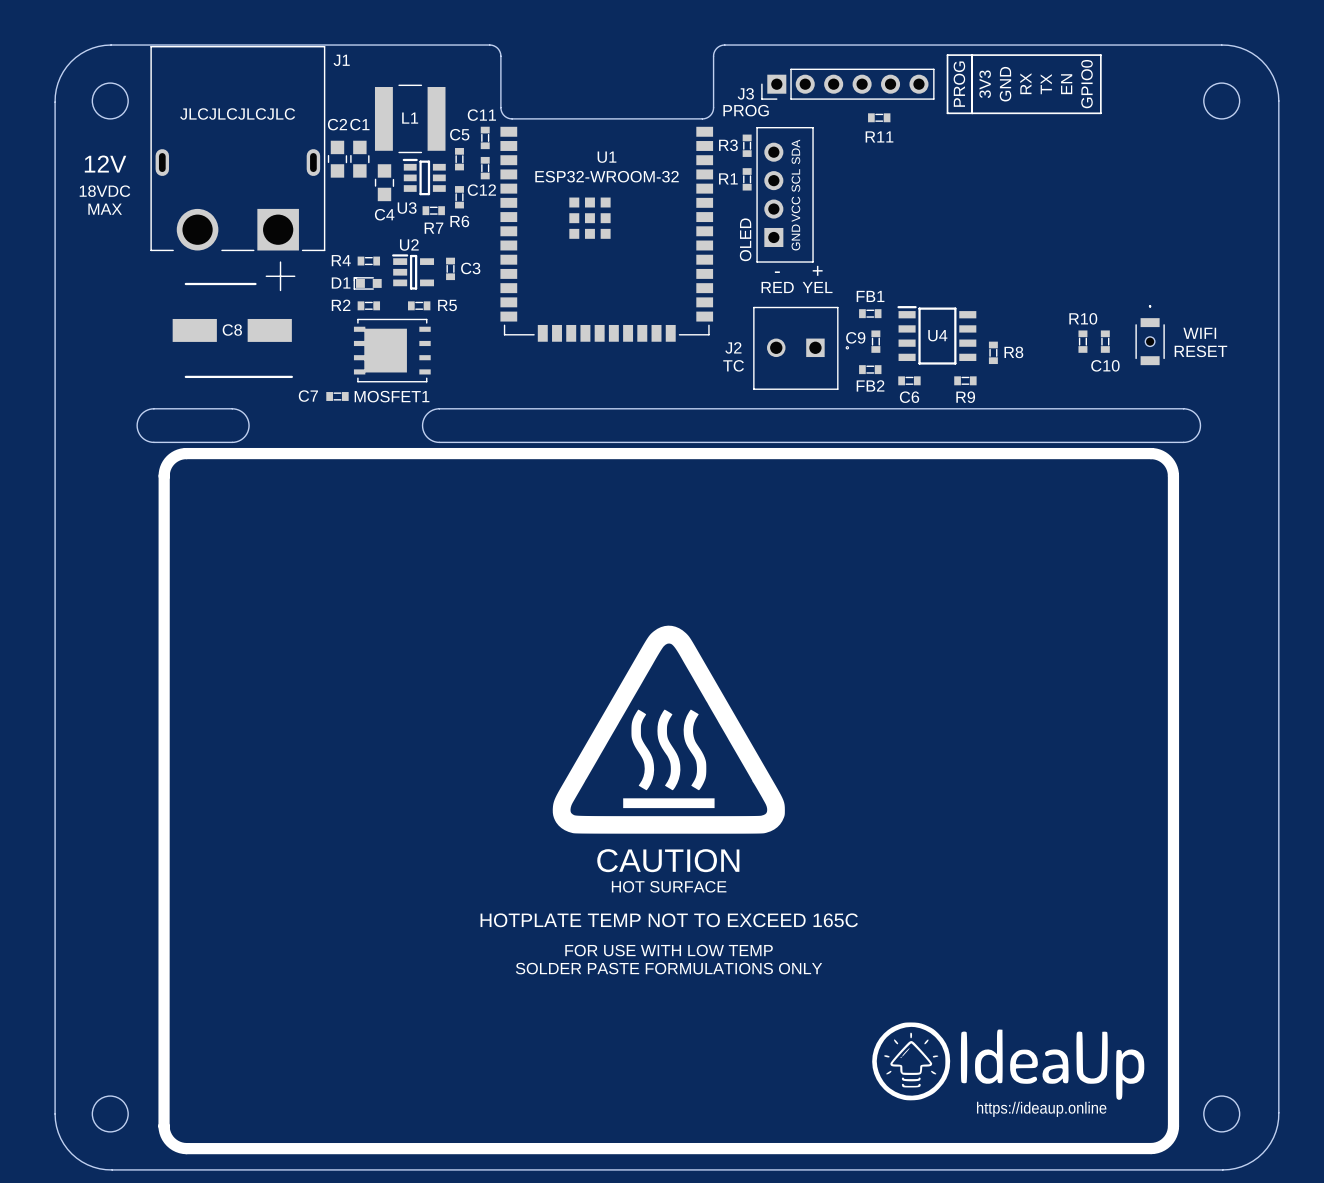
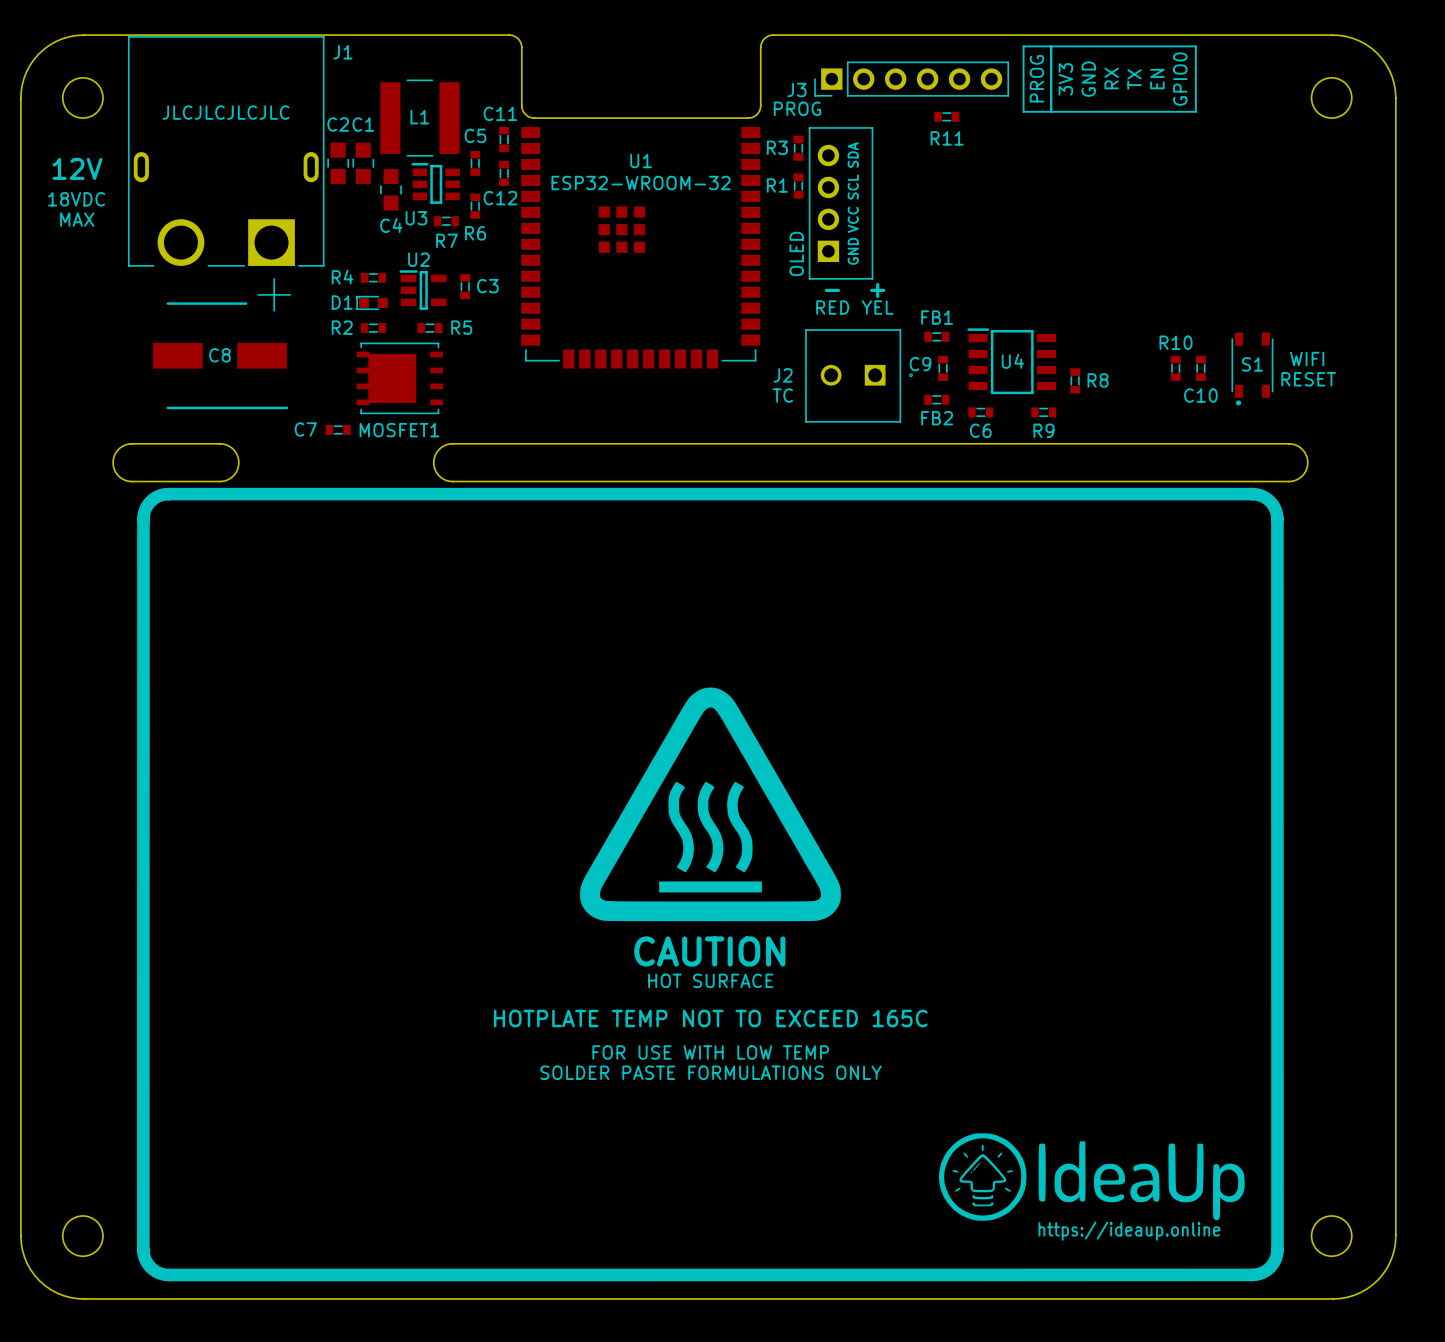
part: (1150, 335) -> none
S1: none -> (1252, 368)

